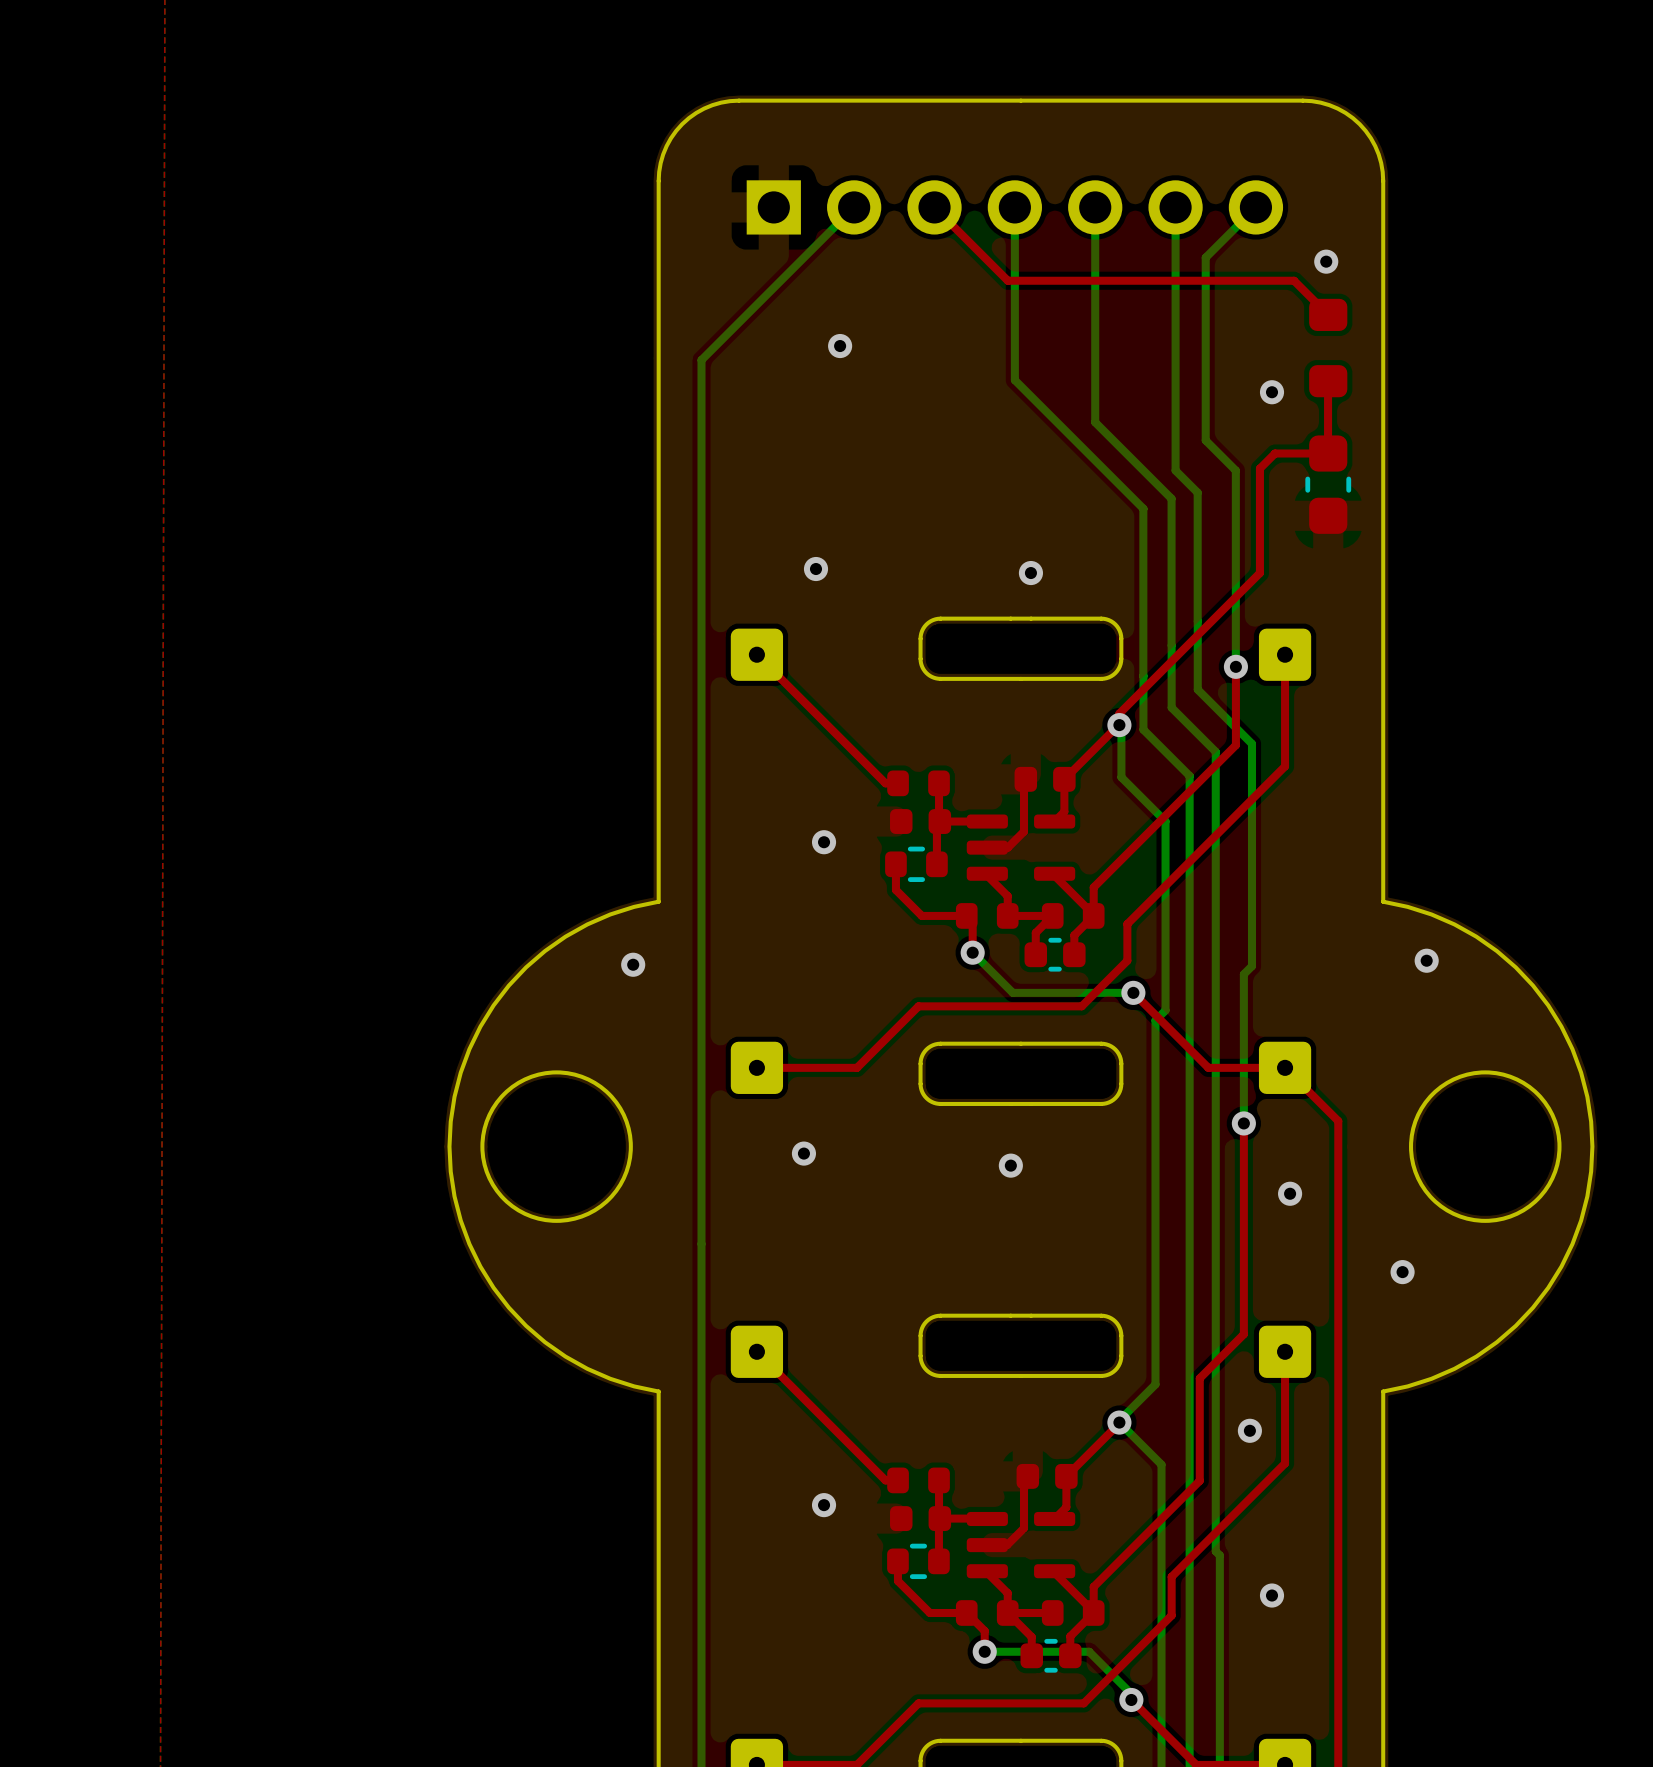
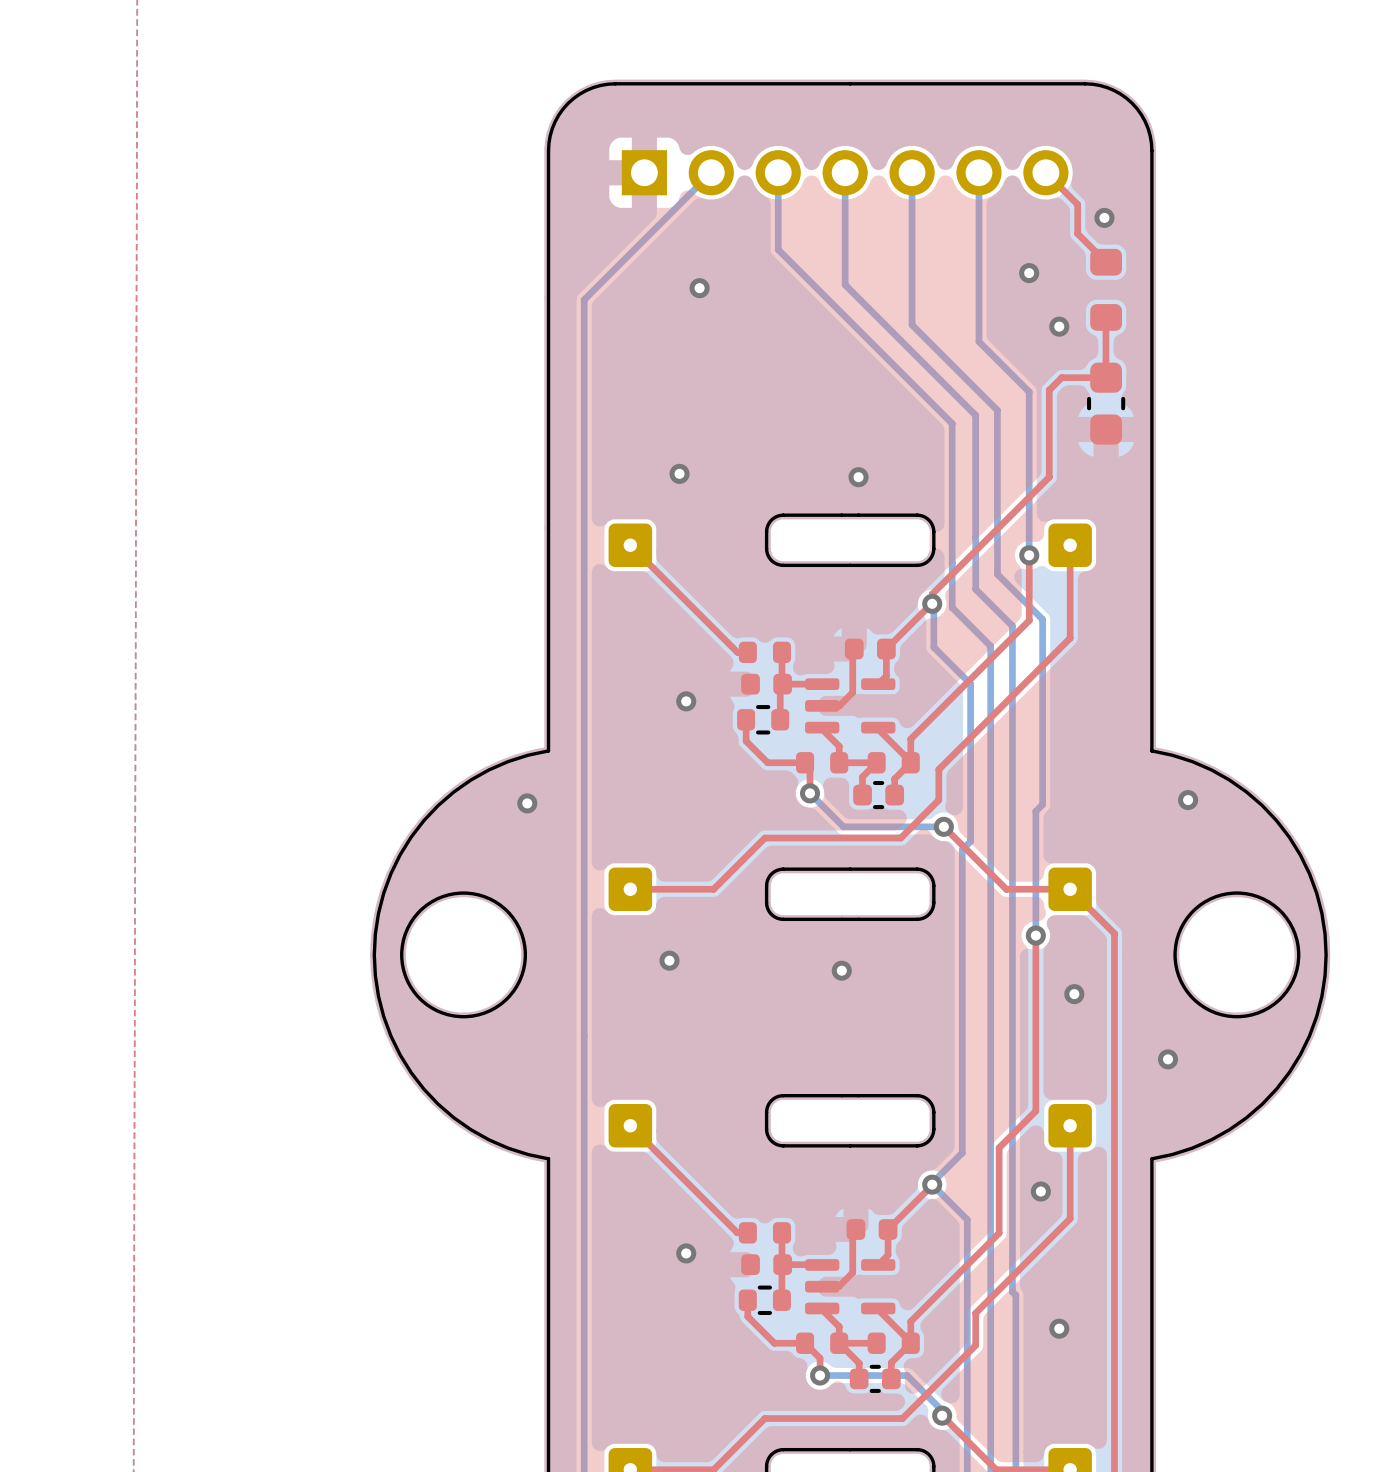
top track: (934, 207) (1007, 280) (1294, 280) -> (1045, 172) (1077, 204) (1077, 233)
bottom track: none -> (778, 172) (778, 249) (845, 316)
bottom track: (1255, 207) (1205, 257) (1205, 440) -> none
via: none -> (1029, 273)
bottom track: (1014, 342) (1014, 380) -> (845, 284) (912, 351)
bottom track: (1095, 390) (1095, 422) -> (912, 324) (978, 391)
bottom track: (1175, 410) (1175, 470) -> (978, 341) (1004, 366)

